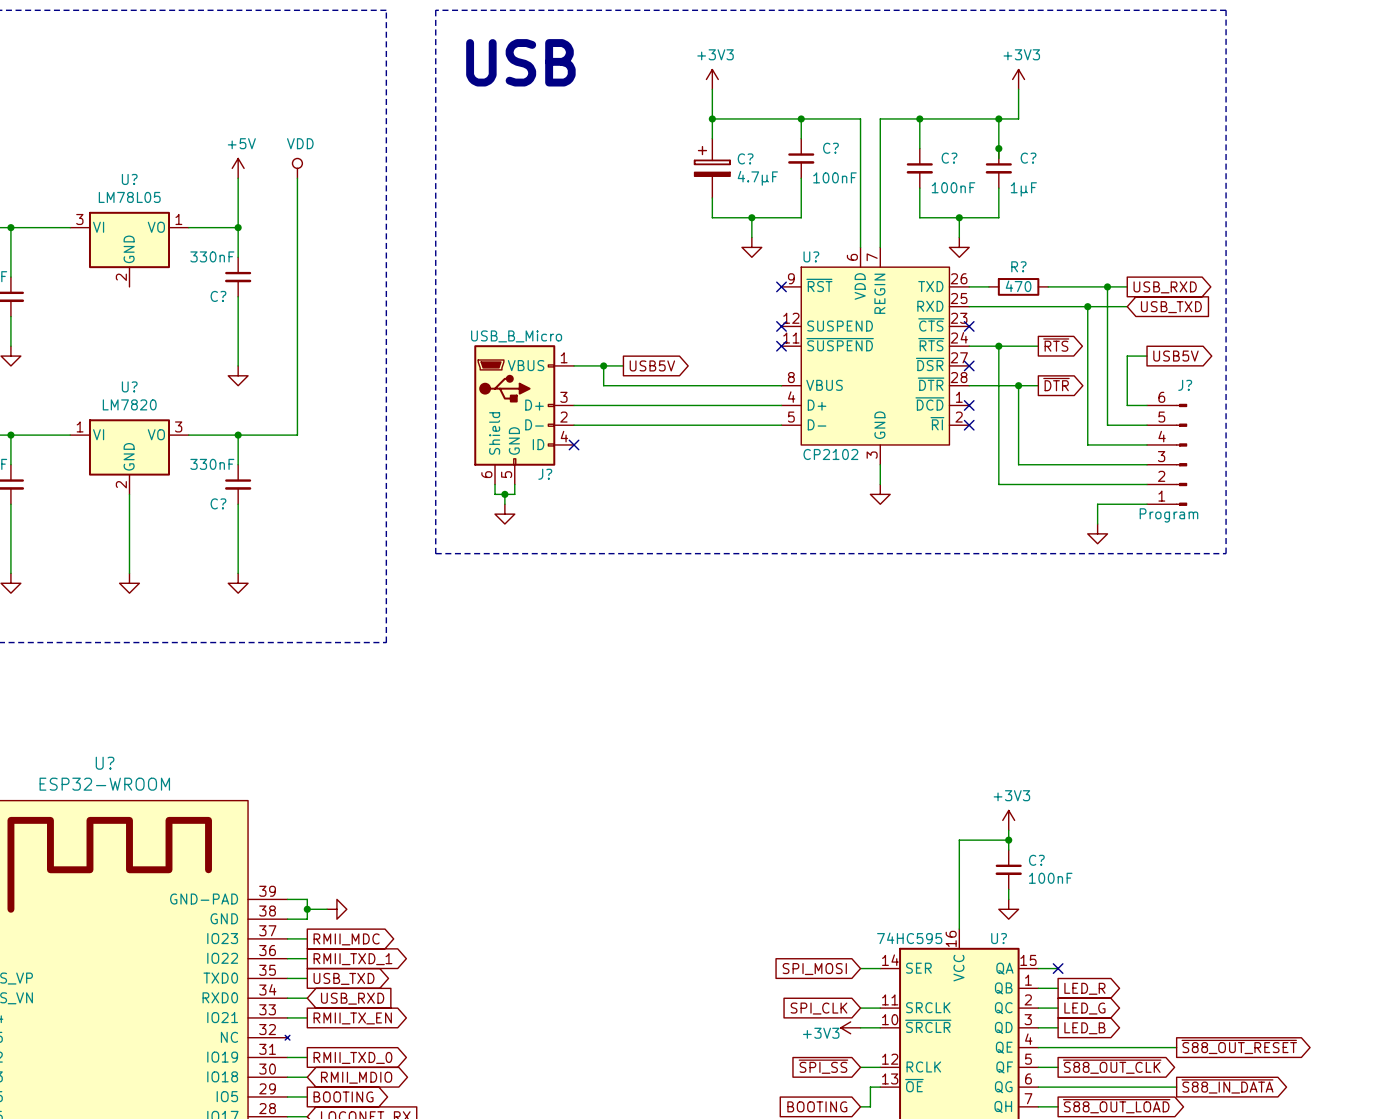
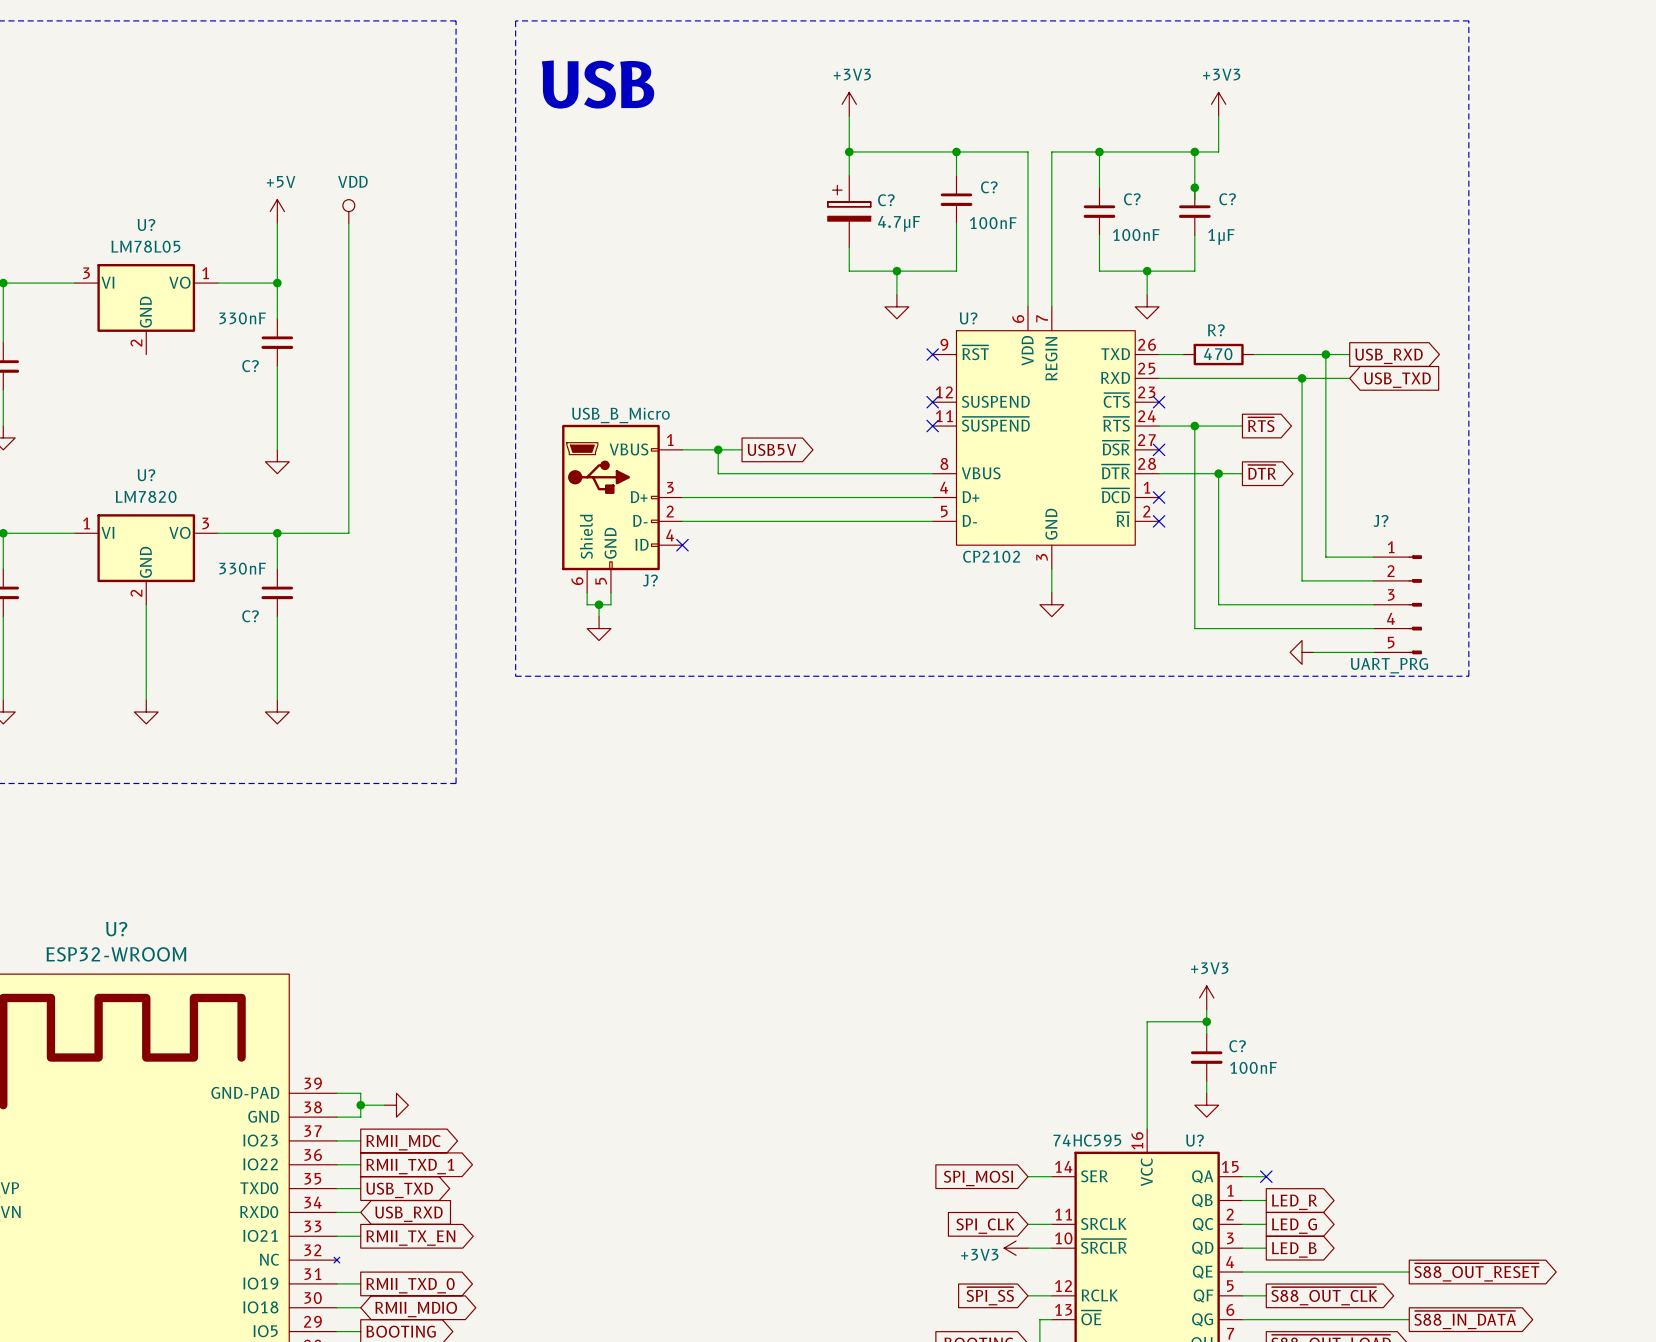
wire: (1147, 356) (1127, 356) (1127, 405) (1147, 405) -> none
global label: USB5V (1175, 356) -> none
wire: (1107, 425) (1147, 425) -> (1325, 521) (1325, 557) (1373, 557)
wire: (1087, 444) (1147, 444) -> (1302, 545) (1302, 580) (1373, 580)
J?: Program (1167, 454) -> none
wire: (1018, 464) (1147, 464) -> (1218, 569) (1218, 604) (1373, 604)
wire: (998, 484) (1147, 484) -> (1194, 592) (1194, 628) (1373, 628)
J?: none -> UART_PRG (1397, 604)
wire: (1147, 504) (1097, 504) (1097, 524) -> none
wire: none -> (1313, 652) (1373, 652)
power symbol rotation: 0° (1097, 533) -> 90° clockwise (1302, 652)

